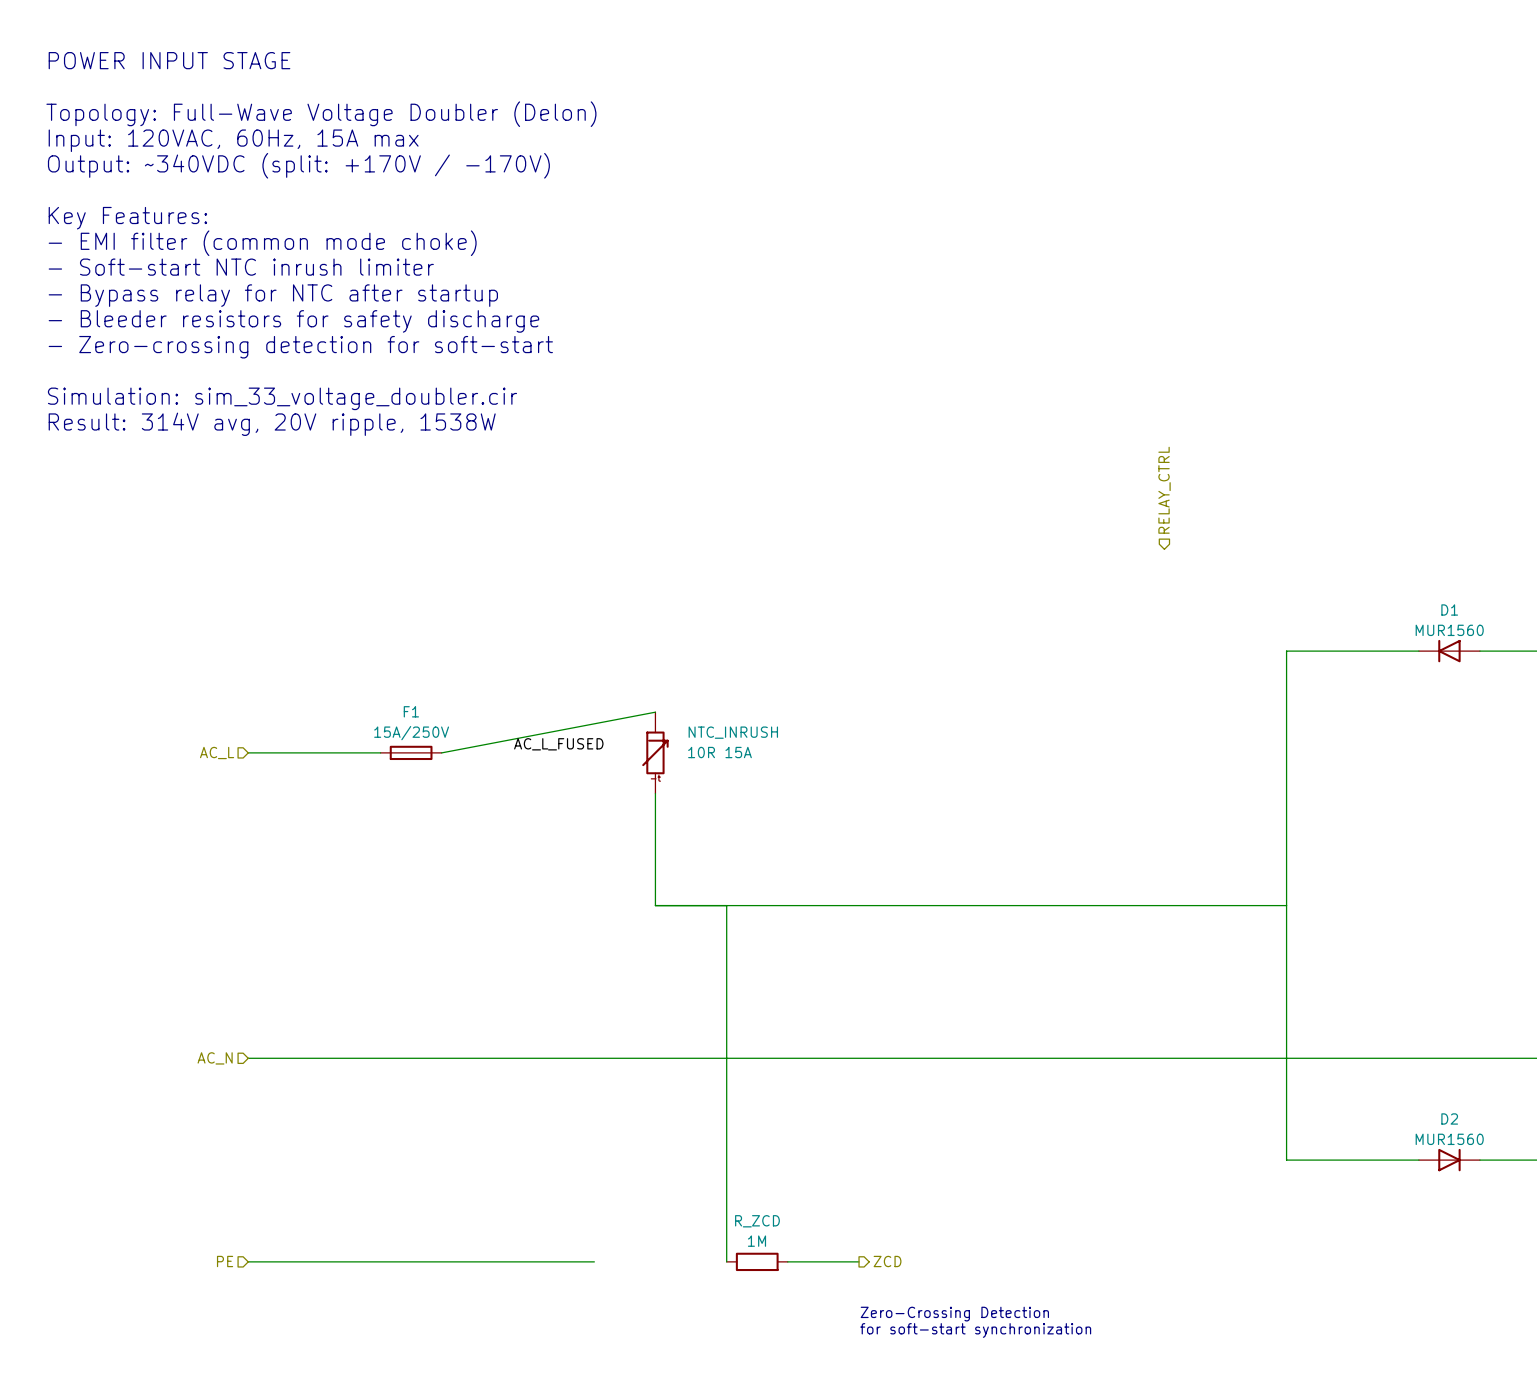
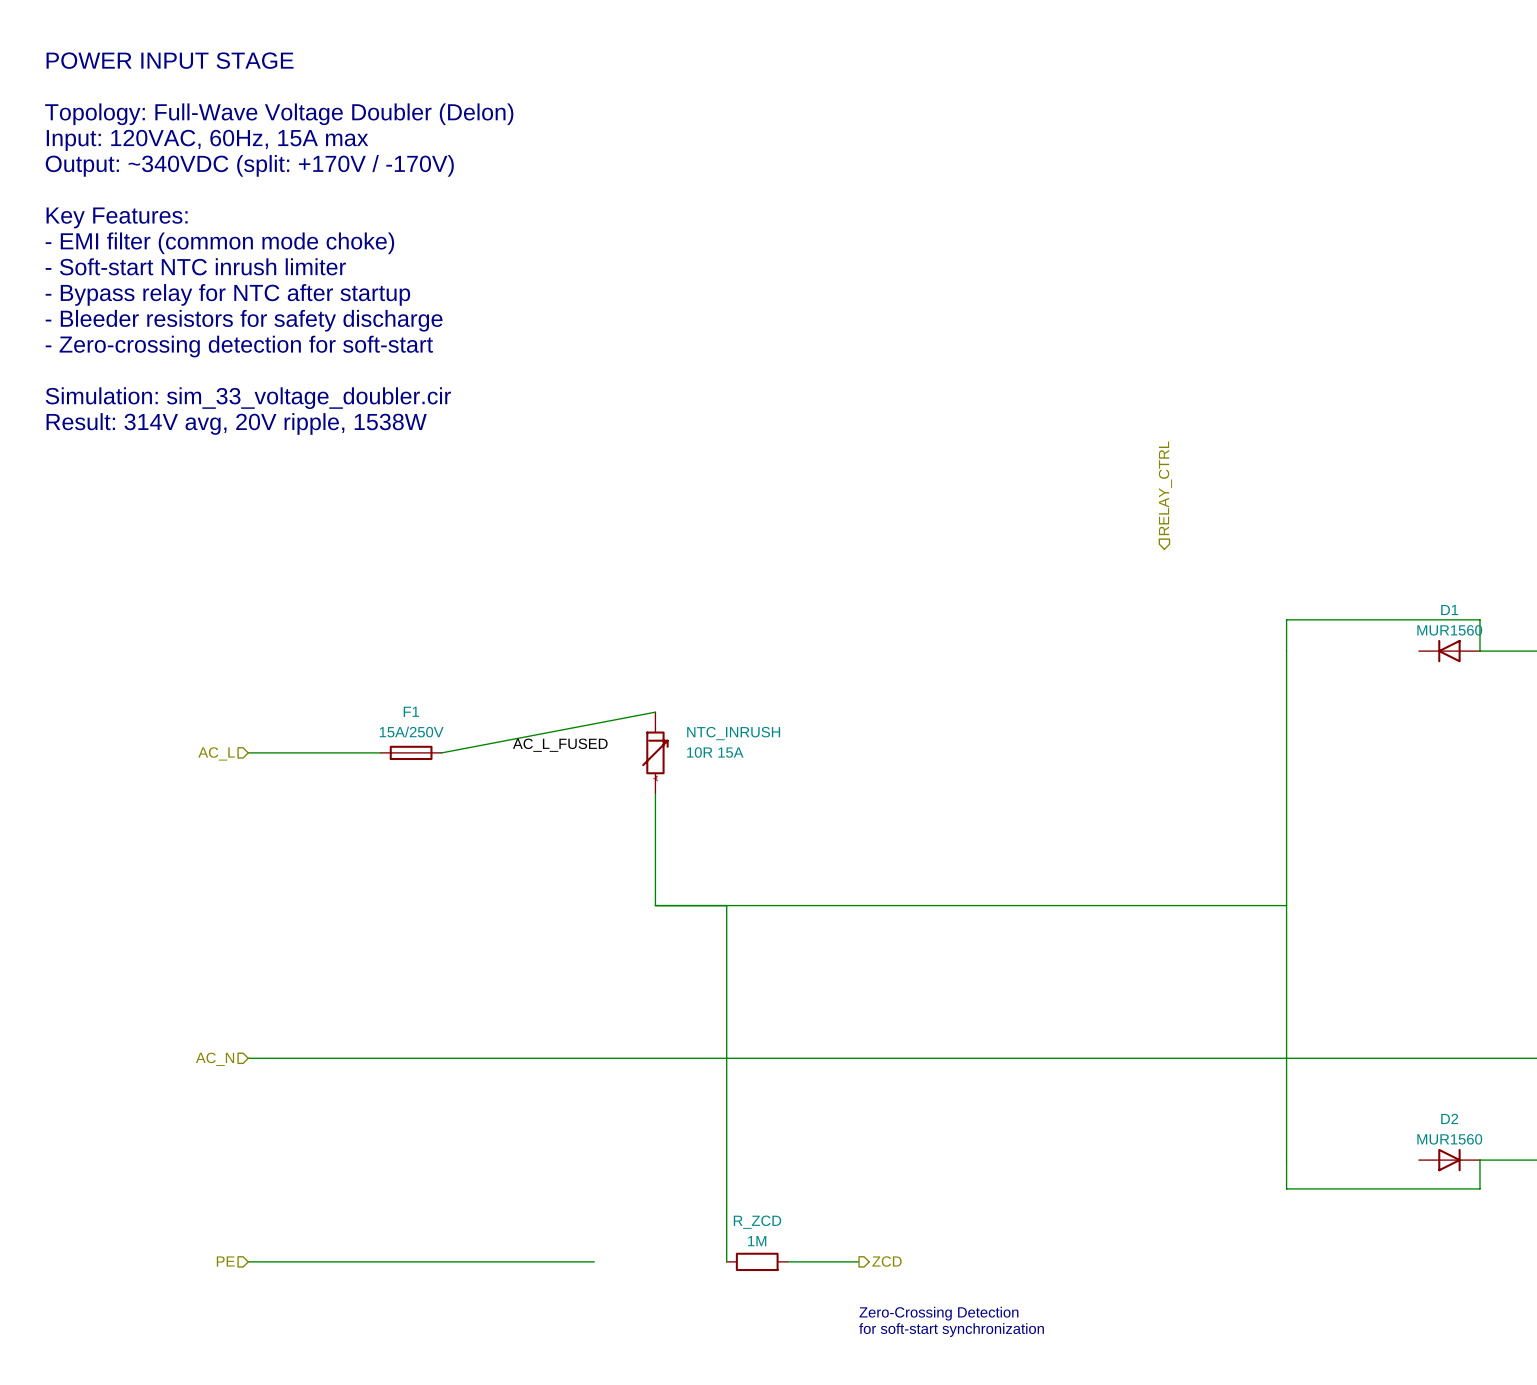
wire: (1286, 651) (1418, 651) -> (1286, 651) (1286, 619) (1479, 619) (1479, 651)
wire: (1286, 1160) (1418, 1160) -> (1286, 1160) (1286, 1188) (1479, 1188) (1479, 1160)

